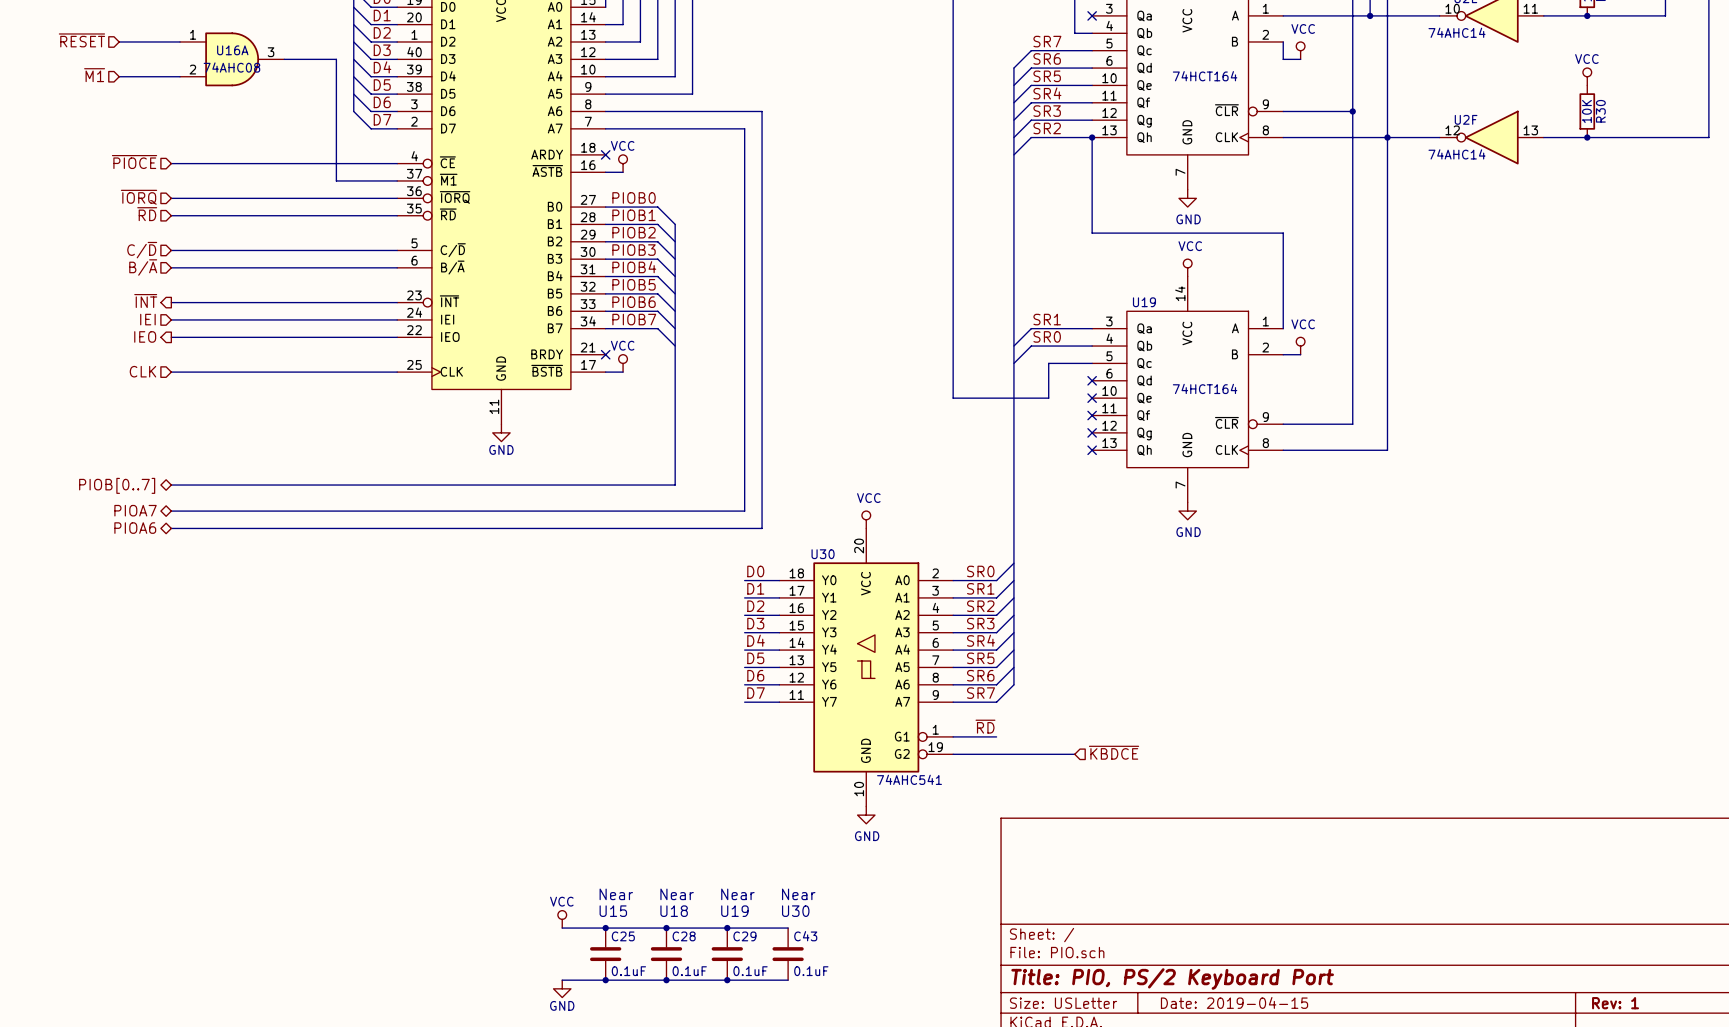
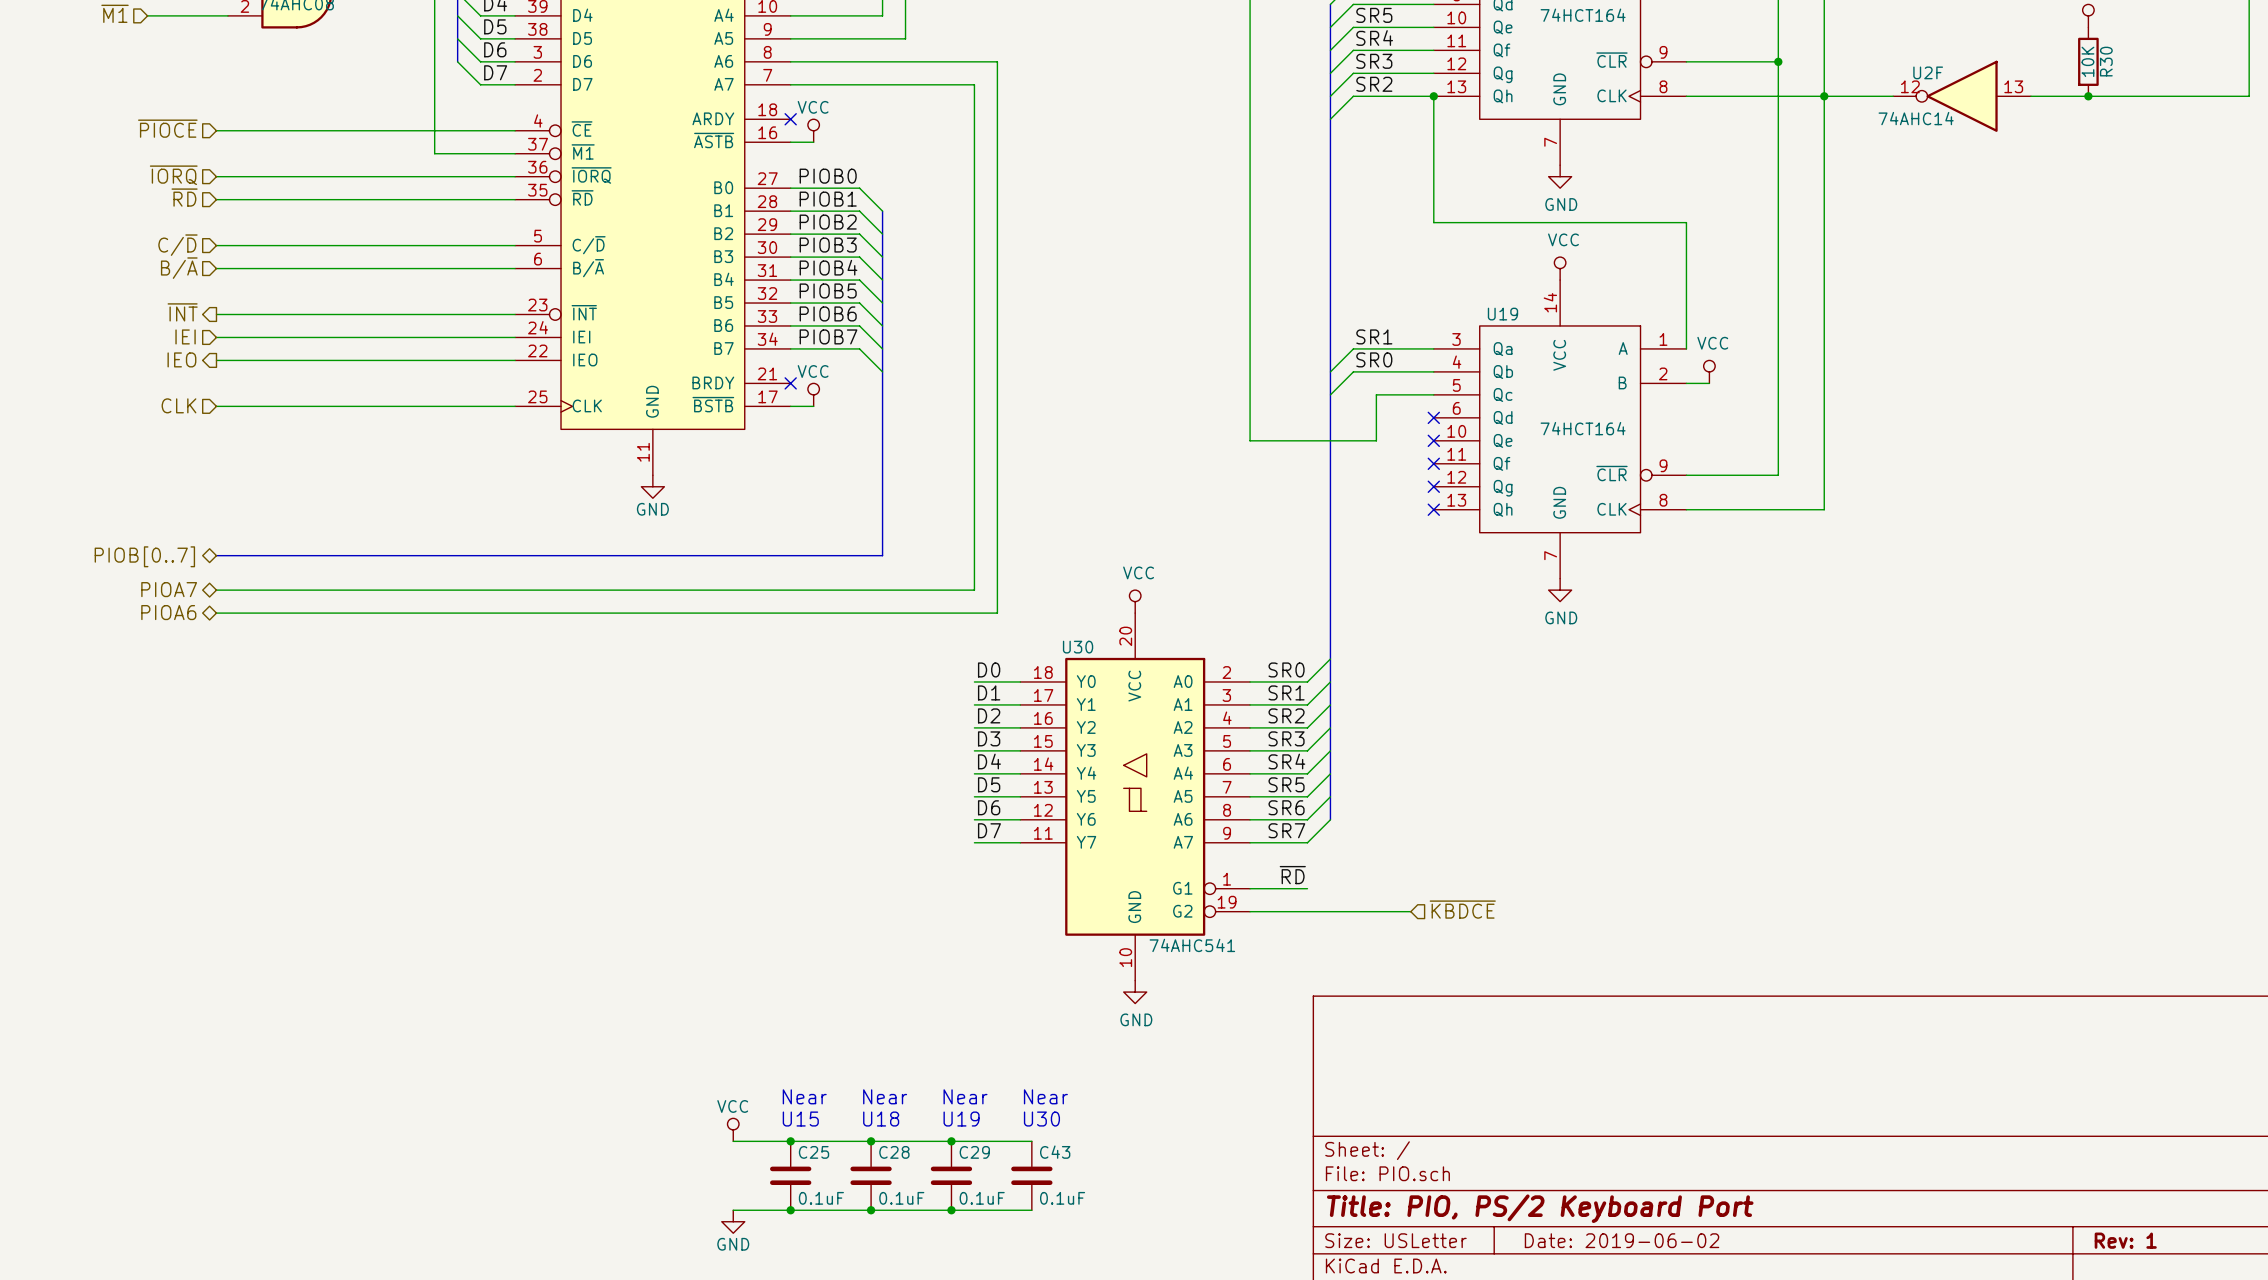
title block: Date: 2019-04-15 (1234, 1002) -> Date: 2019-06-02 (1622, 1240)

